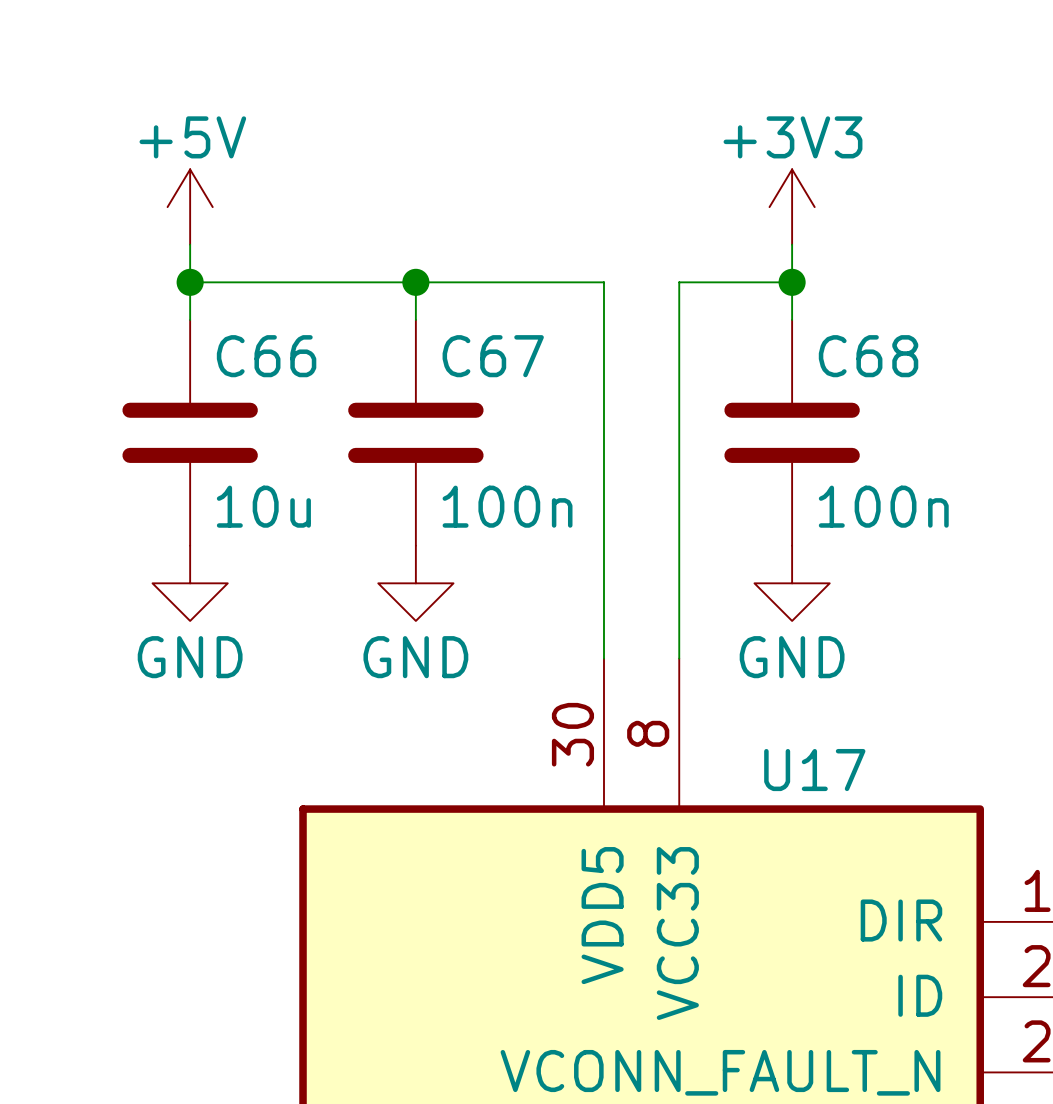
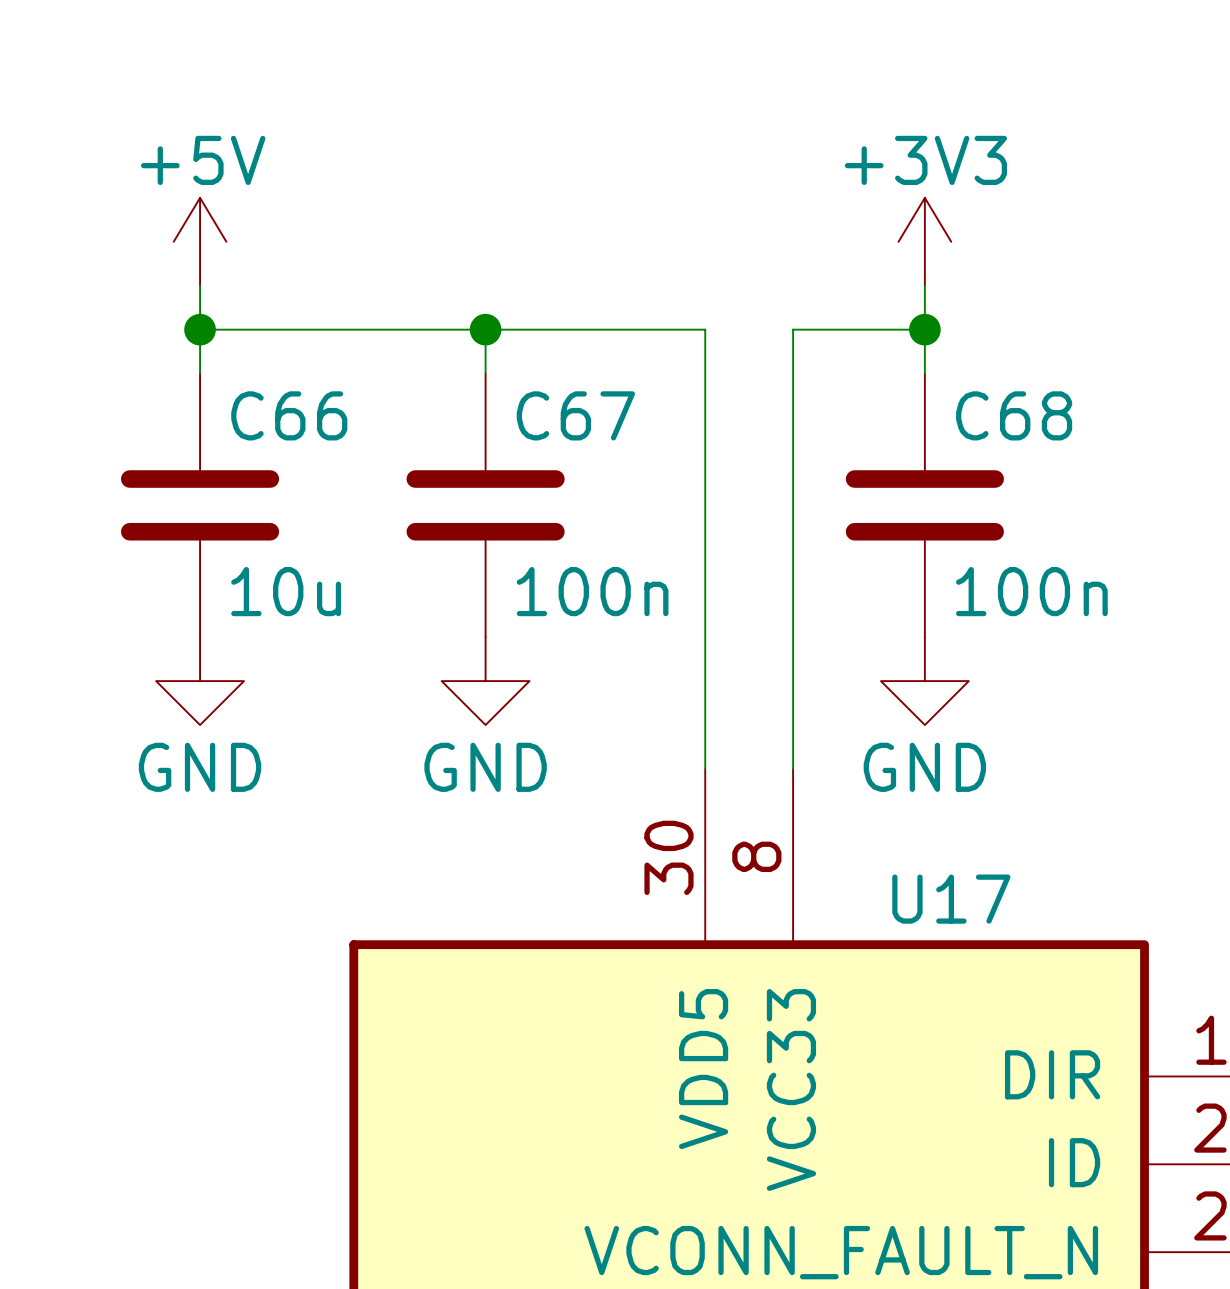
power symbol position: +5V (190, 207) -> +5V (200, 241)
wire: (190, 244) (190, 319) -> (200, 285) (200, 373)
junction position: (190, 282) -> (200, 329)
C66 position: (190, 432) -> (200, 505)
power symbol position: GND (190, 583) -> GND (200, 681)

